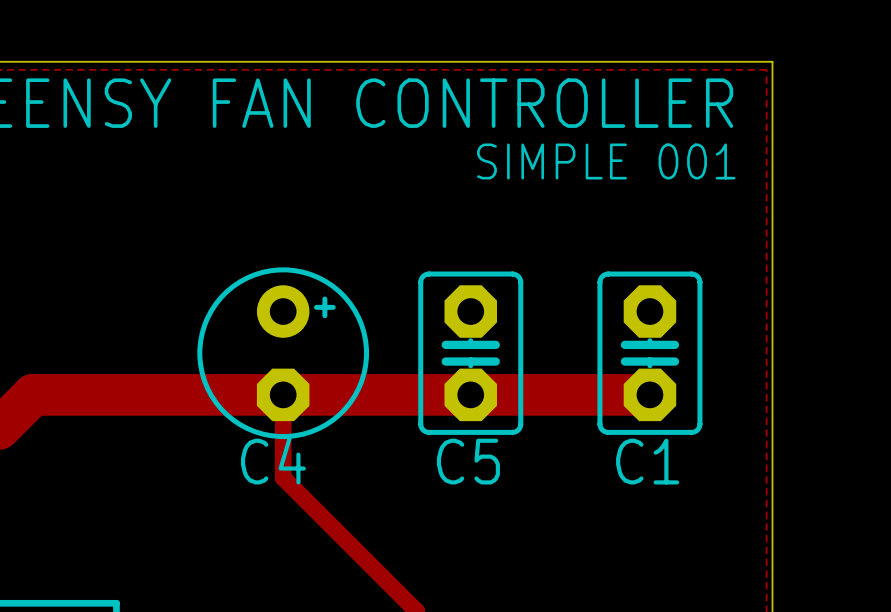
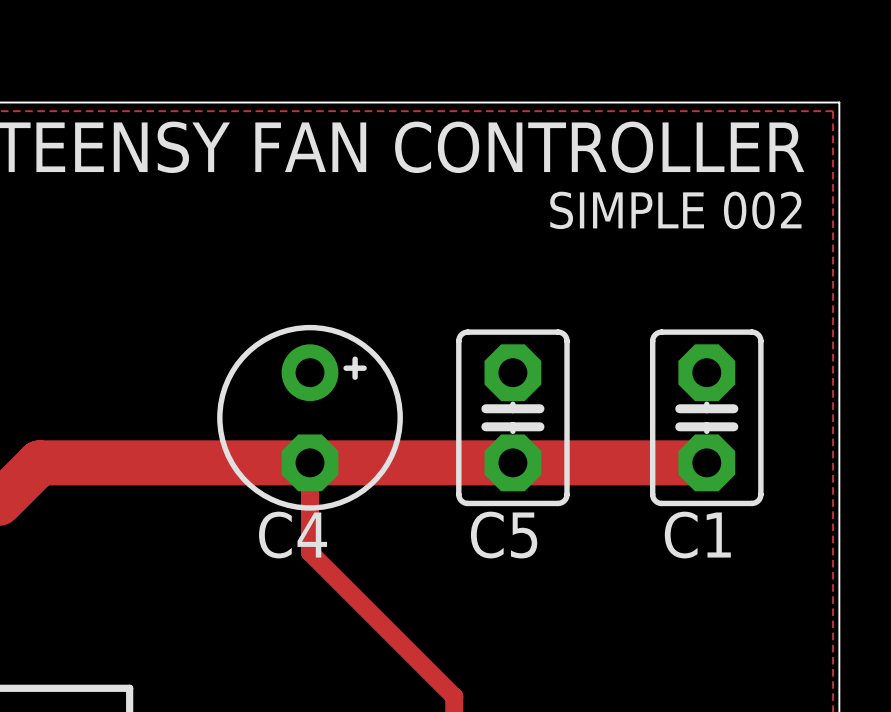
text: SIMPLE 001 (606, 161) -> SIMPLE 002 (675, 210)

